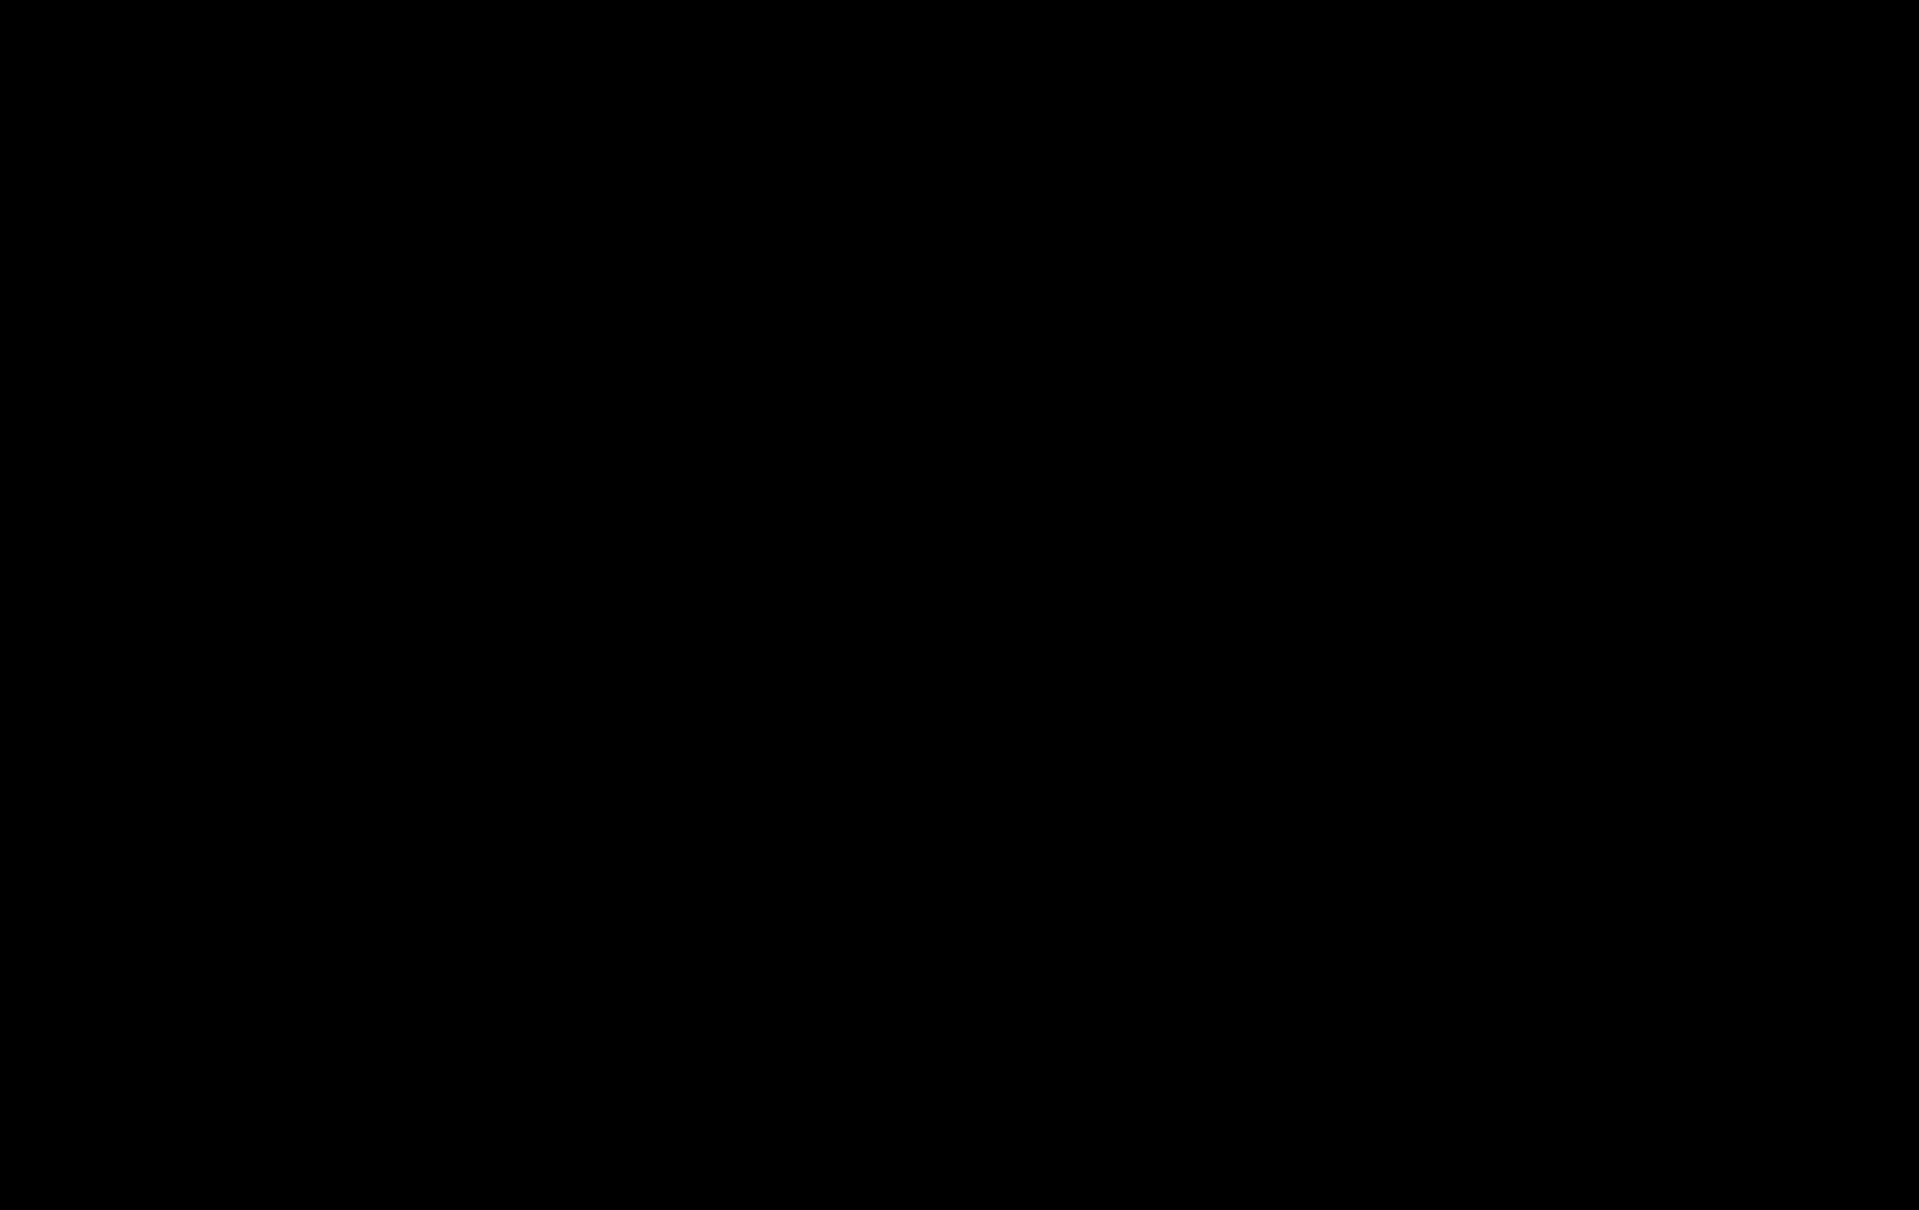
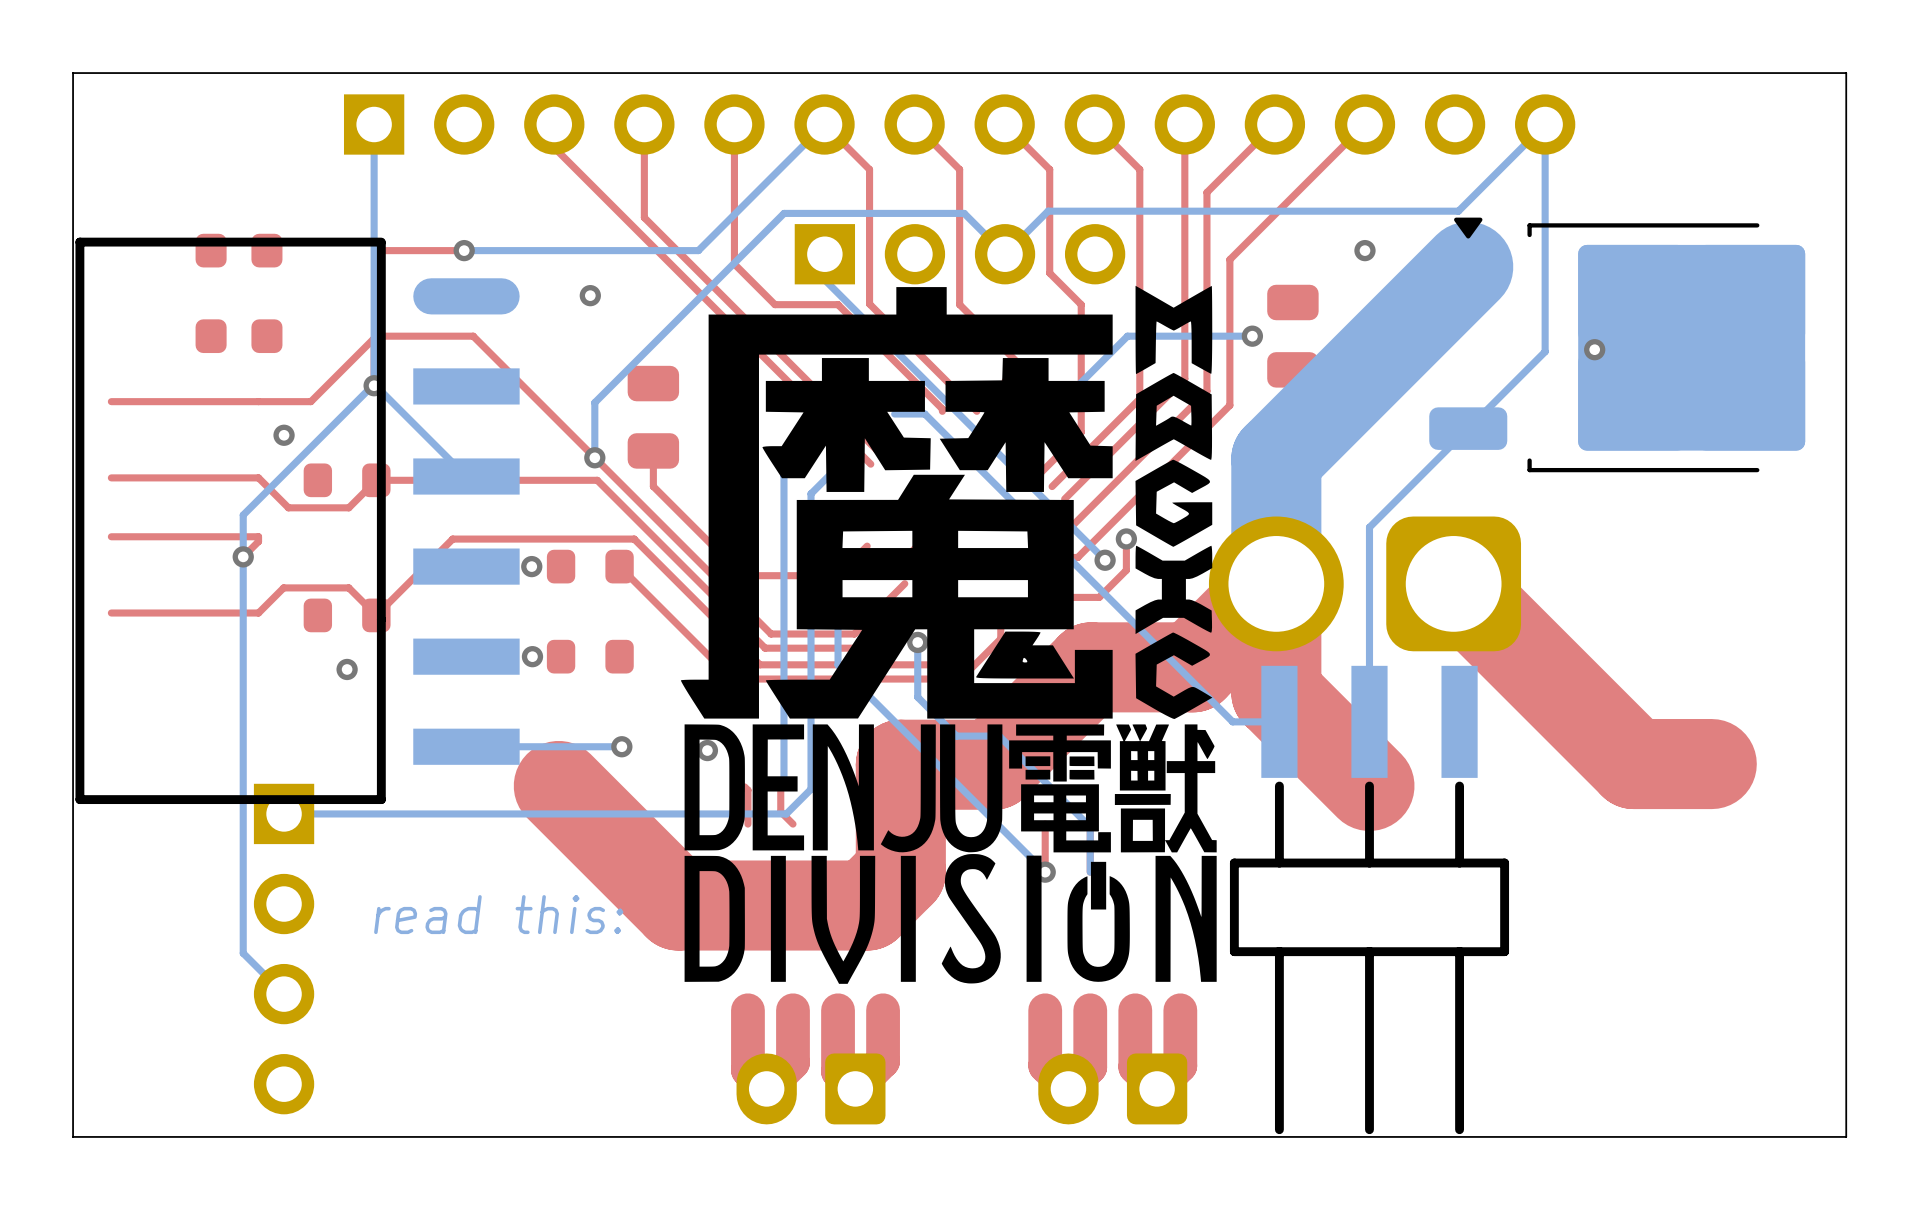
board edge: none -> (1846, 73) (73, 73) (73, 1136) (1846, 1136) (1846, 73)
bottom track: none -> (374, 124) (374, 384)
top track: none -> (554, 124) (554, 147) (870, 464)
top track: none -> (644, 124) (644, 217) (876, 449) (880, 449) (892, 461)
top track: none -> (734, 124) (734, 264) (774, 304) (838, 304) (942, 409) (942, 411)
top track: none -> (824, 124) (869, 169) (869, 304) (976, 411)
bottom track: none -> (824, 124) (698, 250) (464, 250)
top track: none -> (914, 124) (959, 169) (959, 304) (1027, 372) (1027, 411) (1001, 436)
part: none -> (959, 124)
top track: none -> (1004, 124) (1049, 169) (1049, 273) (1081, 304) (1081, 432) (1039, 474)
top track: none -> (1094, 124) (1139, 169) (1139, 398) (1052, 486)
top track: none -> (1184, 124) (1184, 378) (1064, 499)
top track: none -> (1274, 124) (1206, 192) (1206, 391) (1064, 533)
top track: none -> (1364, 124) (1229, 259) (1229, 405) (1077, 557) (1063, 557) (1052, 546)
part: none -> (239, 250)
top track: none -> (464, 250) (376, 250)
via: none -> (464, 250)
via: none -> (1364, 250)
bottom track: none -> (824, 254) (824, 280) (1105, 560)
part: none -> (959, 254)
bottom track: none -> (1468, 266) (1276, 458) (1276, 583)
drawing: none -> [680, 285, 1217, 984]
via: none -> (590, 295)
part: none -> (239, 336)
bottom track: none -> (1252, 336) (1127, 336) (1046, 417)
via: none -> (1252, 336)
part: none -> (1292, 336)
part: none -> (1617, 344)
via: none -> (1594, 349)
bottom track: none -> (374, 384) (466, 476)
bottom track: none -> (374, 384) (243, 515) (243, 953) (284, 994)
via: none -> (374, 385)
bottom track: none -> (877, 387) (872, 387) (783, 475) (783, 778) (780, 781) (780, 786)
top track: none -> (111, 401) (310, 401) (376, 336) (473, 336) (771, 634) (854, 634) (904, 583)
bottom track: none -> (894, 414) (924, 414) (1232, 721) (1279, 721)
part: none -> (653, 417)
via: none -> (284, 435)
top track: none -> (653, 450) (653, 486) (742, 575) (802, 575) (815, 588) (825, 588) (867, 546)
bottom track: none -> (594, 457) (594, 402) (784, 213) (964, 213) (1005, 254) (1048, 211) (1458, 211) (1545, 124) (1545, 351) (1369, 527) (1369, 721)
via: none -> (594, 457)
bottom track: none -> (839, 465) (811, 493) (811, 789) (786, 813) (284, 813)
top track: none -> (111, 477) (258, 477) (288, 507) (348, 507) (376, 480) (597, 480) (765, 648) (868, 648) (895, 621) (914, 621) (926, 608) (929, 608)
part: none -> (347, 480)
bottom track: none -> (838, 511) (838, 664) (1045, 872)
part: none -> (297, 520)
top track: none -> (111, 536) (258, 536) (258, 541) (243, 556)
top track: none -> (1126, 538) (1126, 570) (1099, 597) (1053, 597) (1027, 571)
via: none -> (1126, 538)
via: none -> (243, 556)
via: none -> (1105, 560)
via: none -> (531, 566)
part: none -> (590, 566)
top track: none -> (619, 566) (732, 679) (960, 679) (1000, 638) (1000, 620) (989, 608)
part: none -> (1364, 583)
top track: none -> (1453, 583) (1633, 764) (1711, 764)
top track: none -> (111, 613) (258, 613) (283, 587) (348, 587) (376, 615) (452, 539) (634, 539) (759, 664) (933, 664) (976, 621)
part: none -> (347, 615)
bottom track: none -> (917, 642) (917, 697) (956, 736) (999, 736) (1090, 827) (1090, 872)
via: none -> (917, 642)
via: none -> (532, 656)
part: none -> (590, 656)
via: none -> (347, 669)
bottom track: none -> (621, 746) (466, 746)
via: none -> (621, 746)
via: none -> (707, 750)
top track: none -> (1369, 785) (1276, 692) (1276, 583) (1192, 667) (1091, 667) (993, 764) (900, 764) (900, 871) (867, 905) (678, 905) (558, 785)
top track: none -> (744, 786) (747, 790) (747, 824)
top track: none -> (780, 786) (780, 811) (792, 824)
top track: none -> (1045, 824) (1045, 872)
via: none -> (1045, 872)
part: none -> (1369, 899)
text: none -> read this: (498, 914)
part: none -> (284, 949)
top track: none -> (792, 1010) (792, 1062) (766, 1088) (747, 1070) (747, 1010)
top track: none -> (883, 1010) (883, 1061) (855, 1088) (838, 1071) (838, 1010)
top track: none -> (1090, 1010) (1090, 1067) (1068, 1088) (1045, 1065) (1045, 1010)
top track: none -> (1180, 1010) (1180, 1065) (1157, 1088) (1135, 1067) (1135, 1010)
part: none -> (811, 1088)
part: none -> (1112, 1088)

